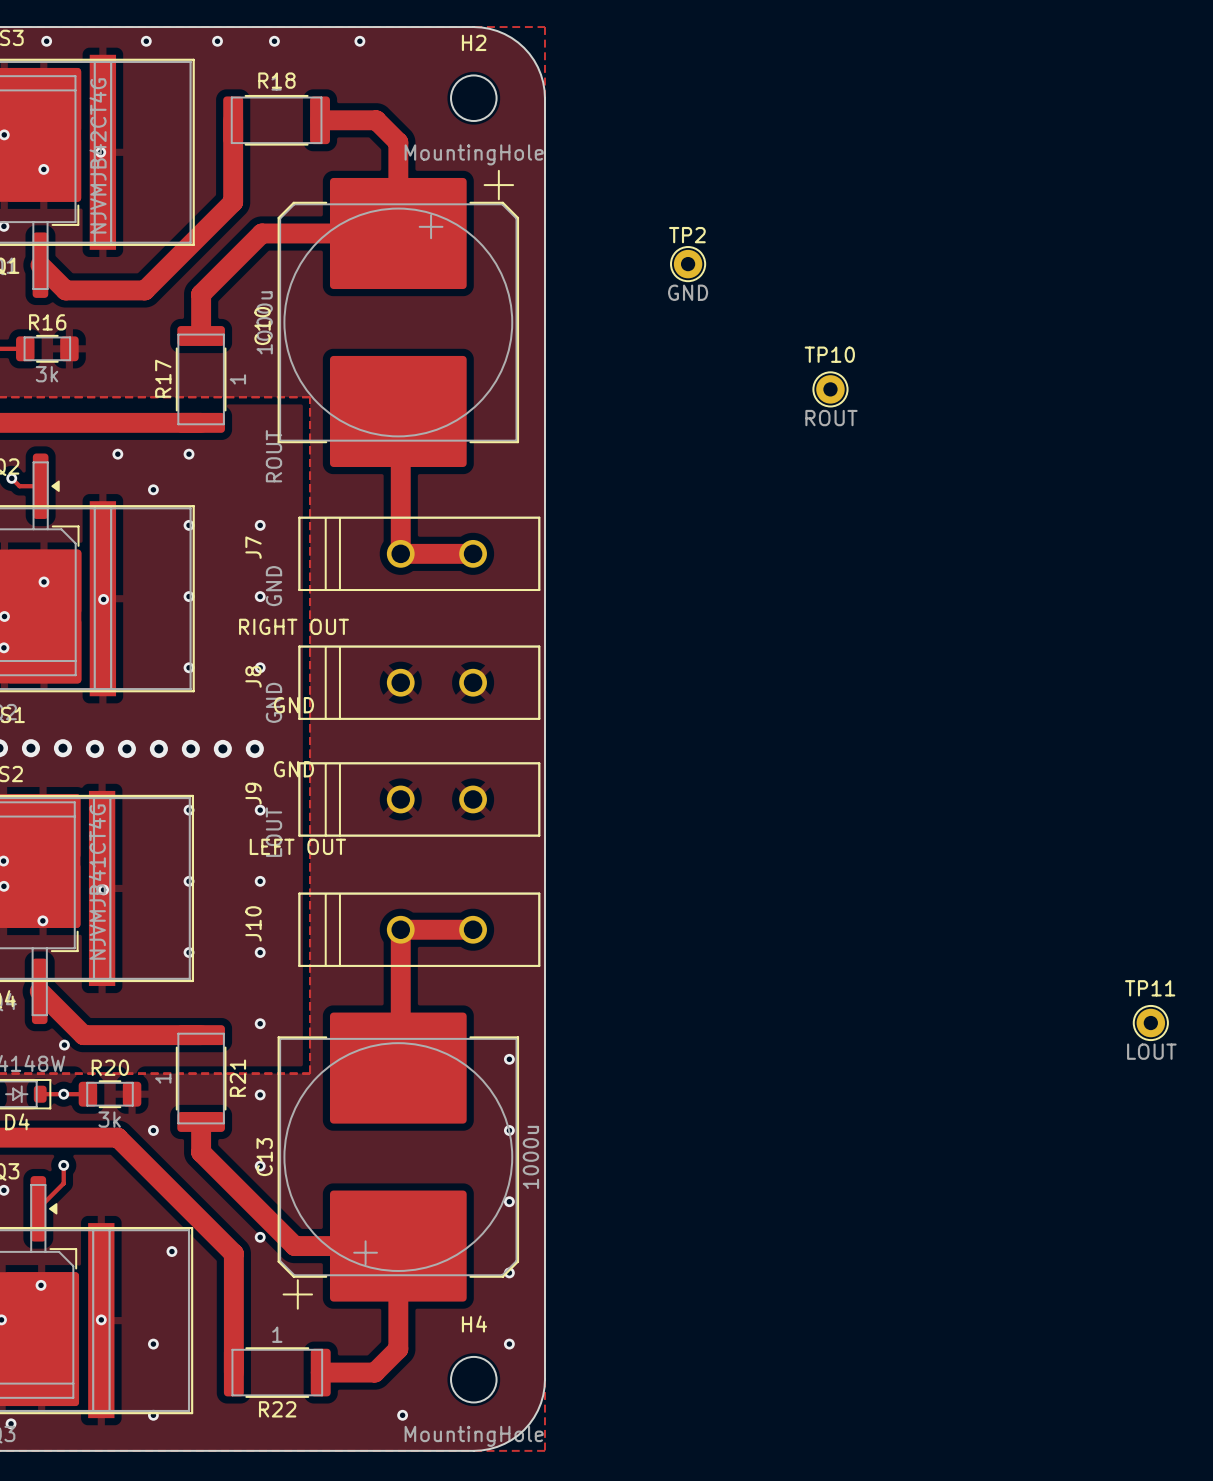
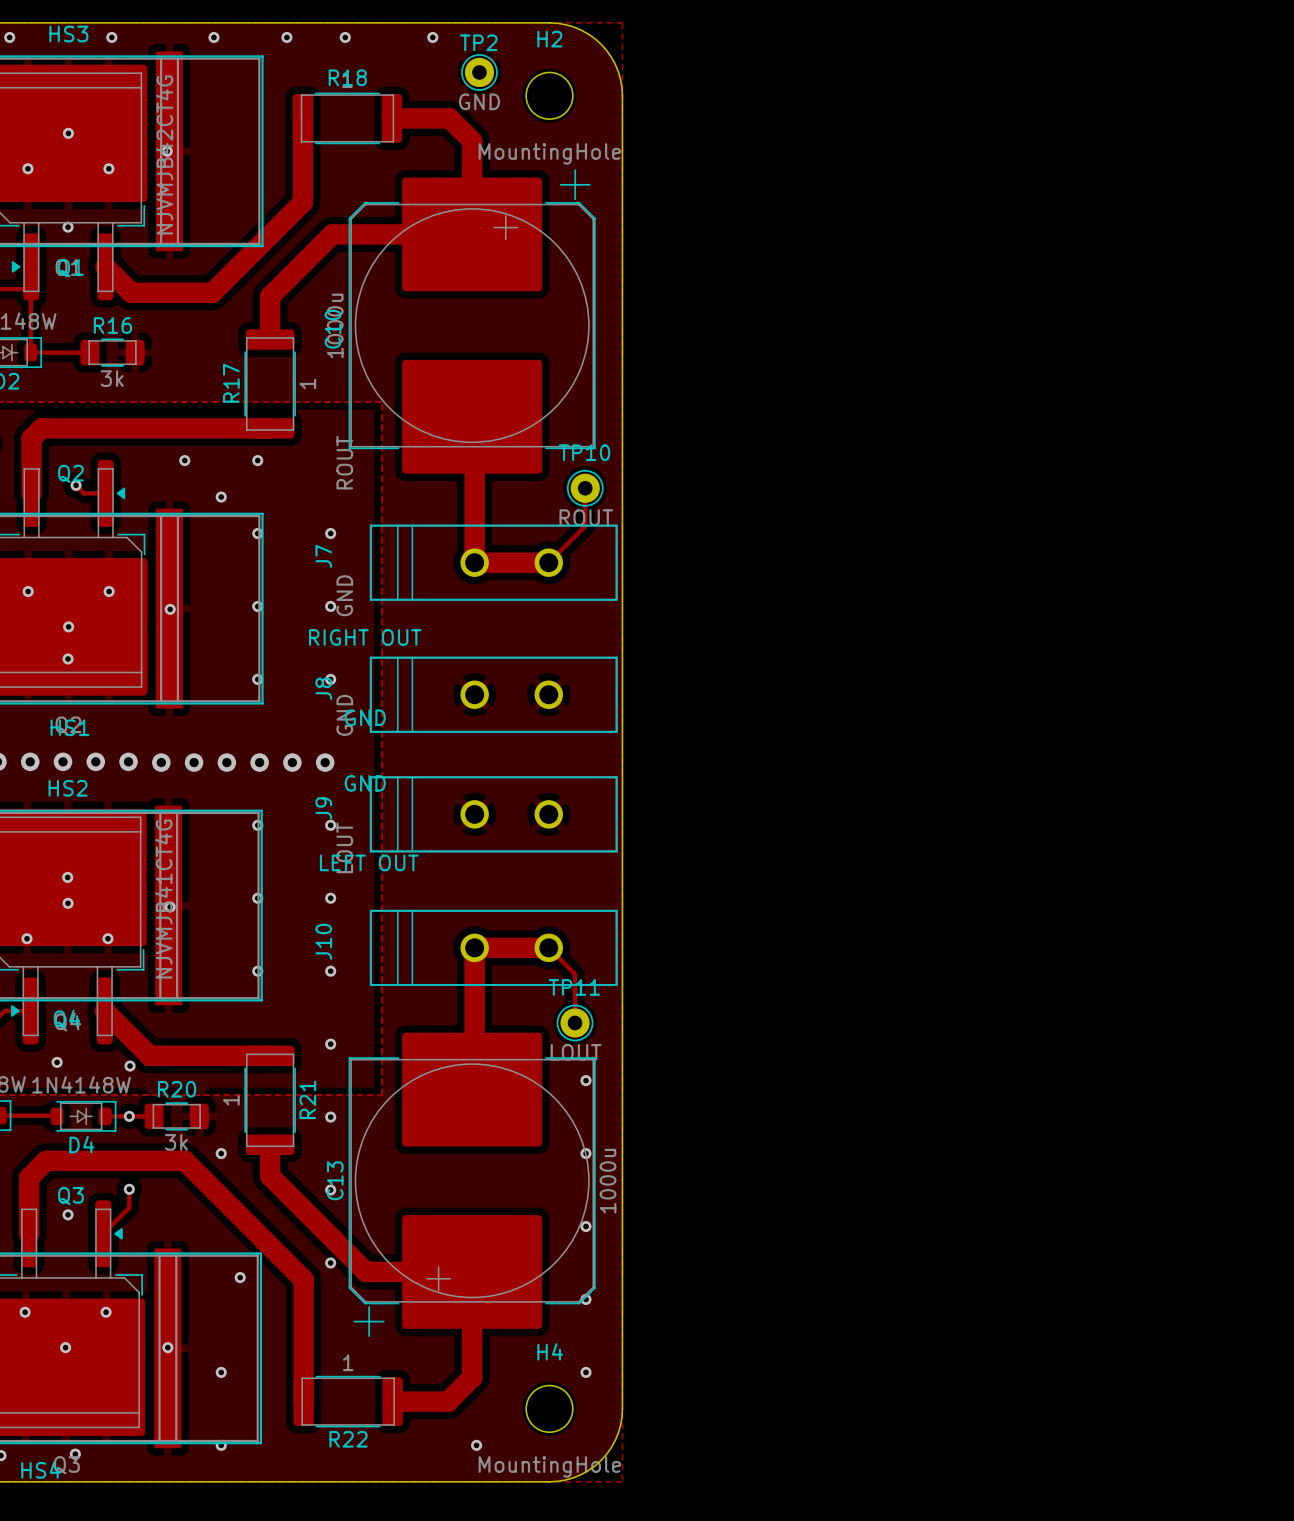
TP2 position: (688, 264) -> (479, 72)
TP10 position: (830, 389) -> (585, 488)
track: none -> (585, 488) (585, 526) (548, 562)
track: none -> (548, 947) (575, 974) (575, 1022)
TP11 position: (1150, 1023) -> (575, 1022)

